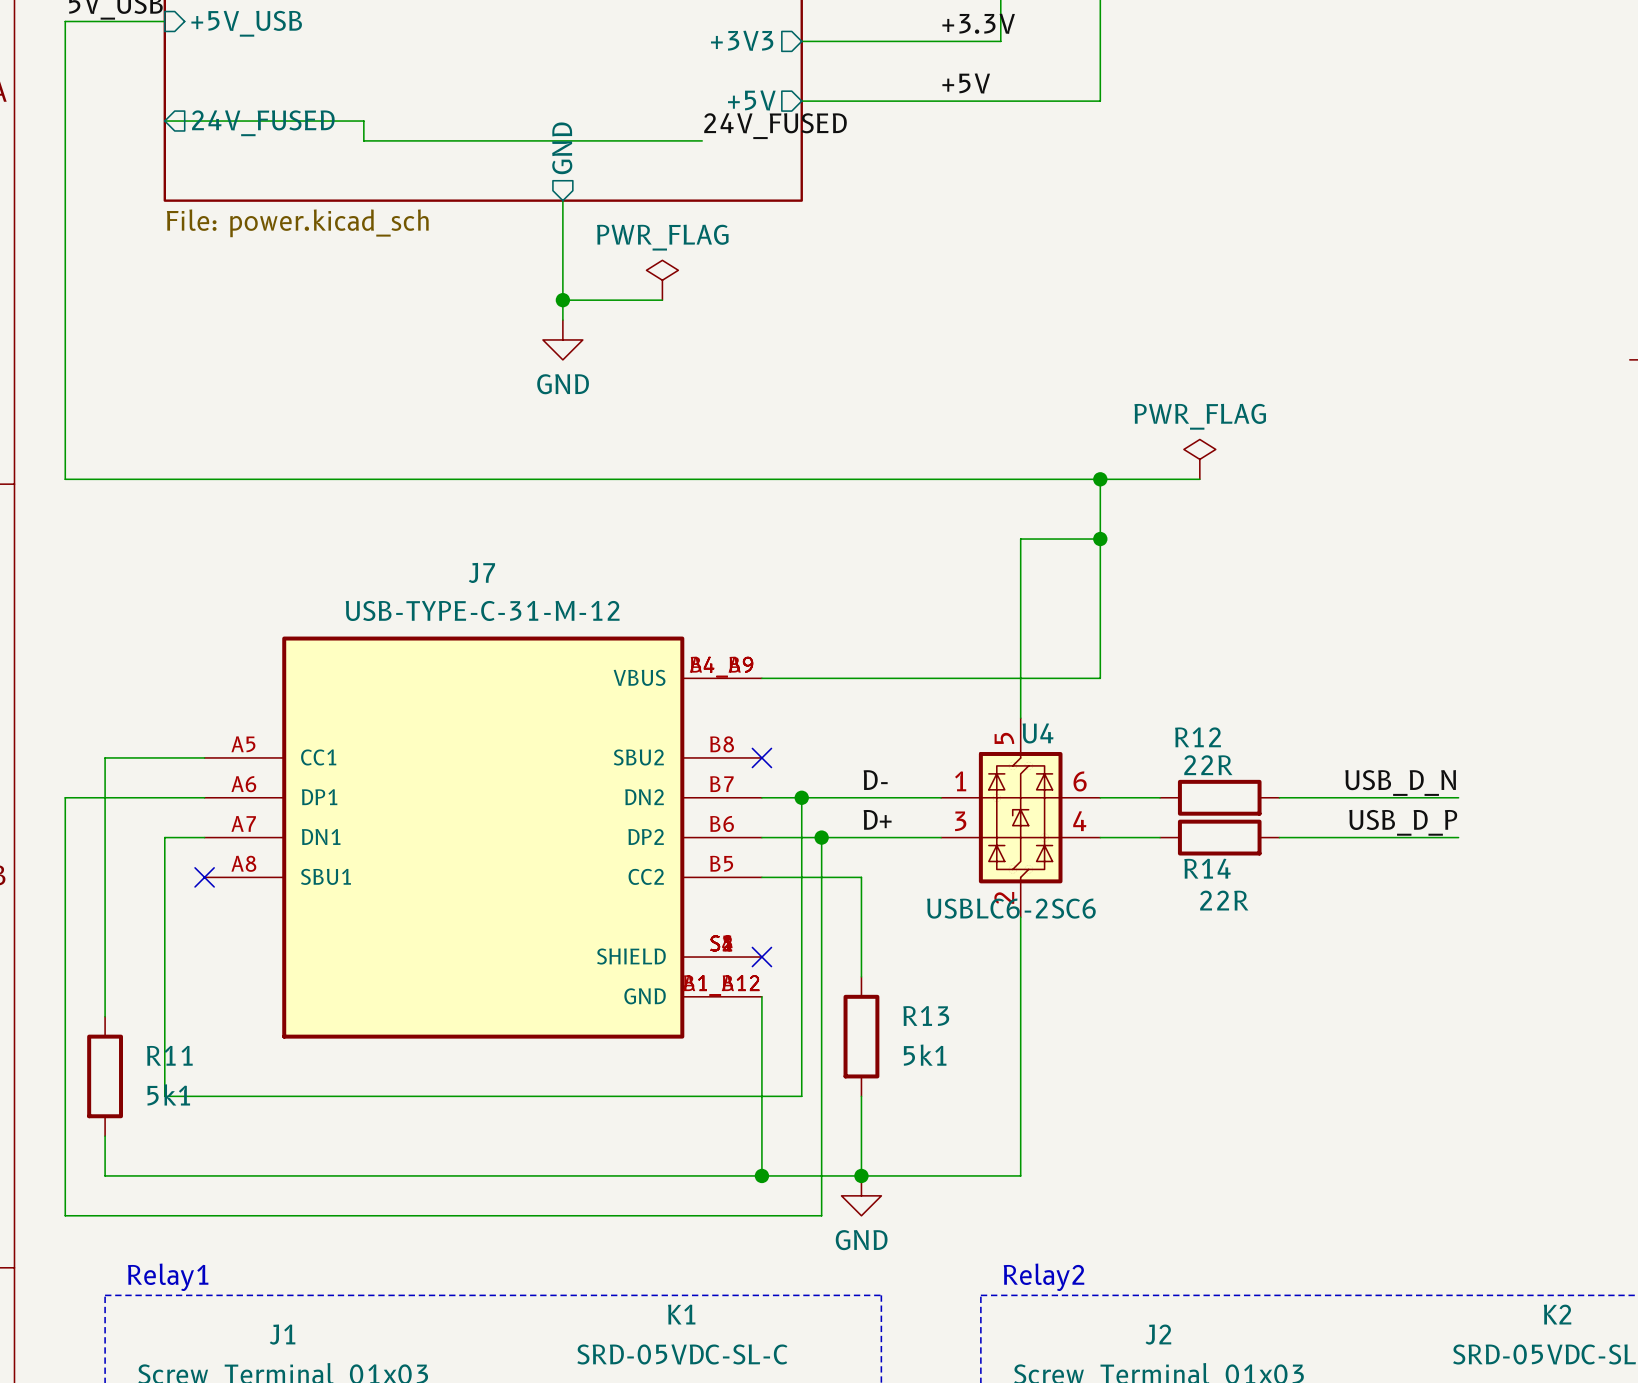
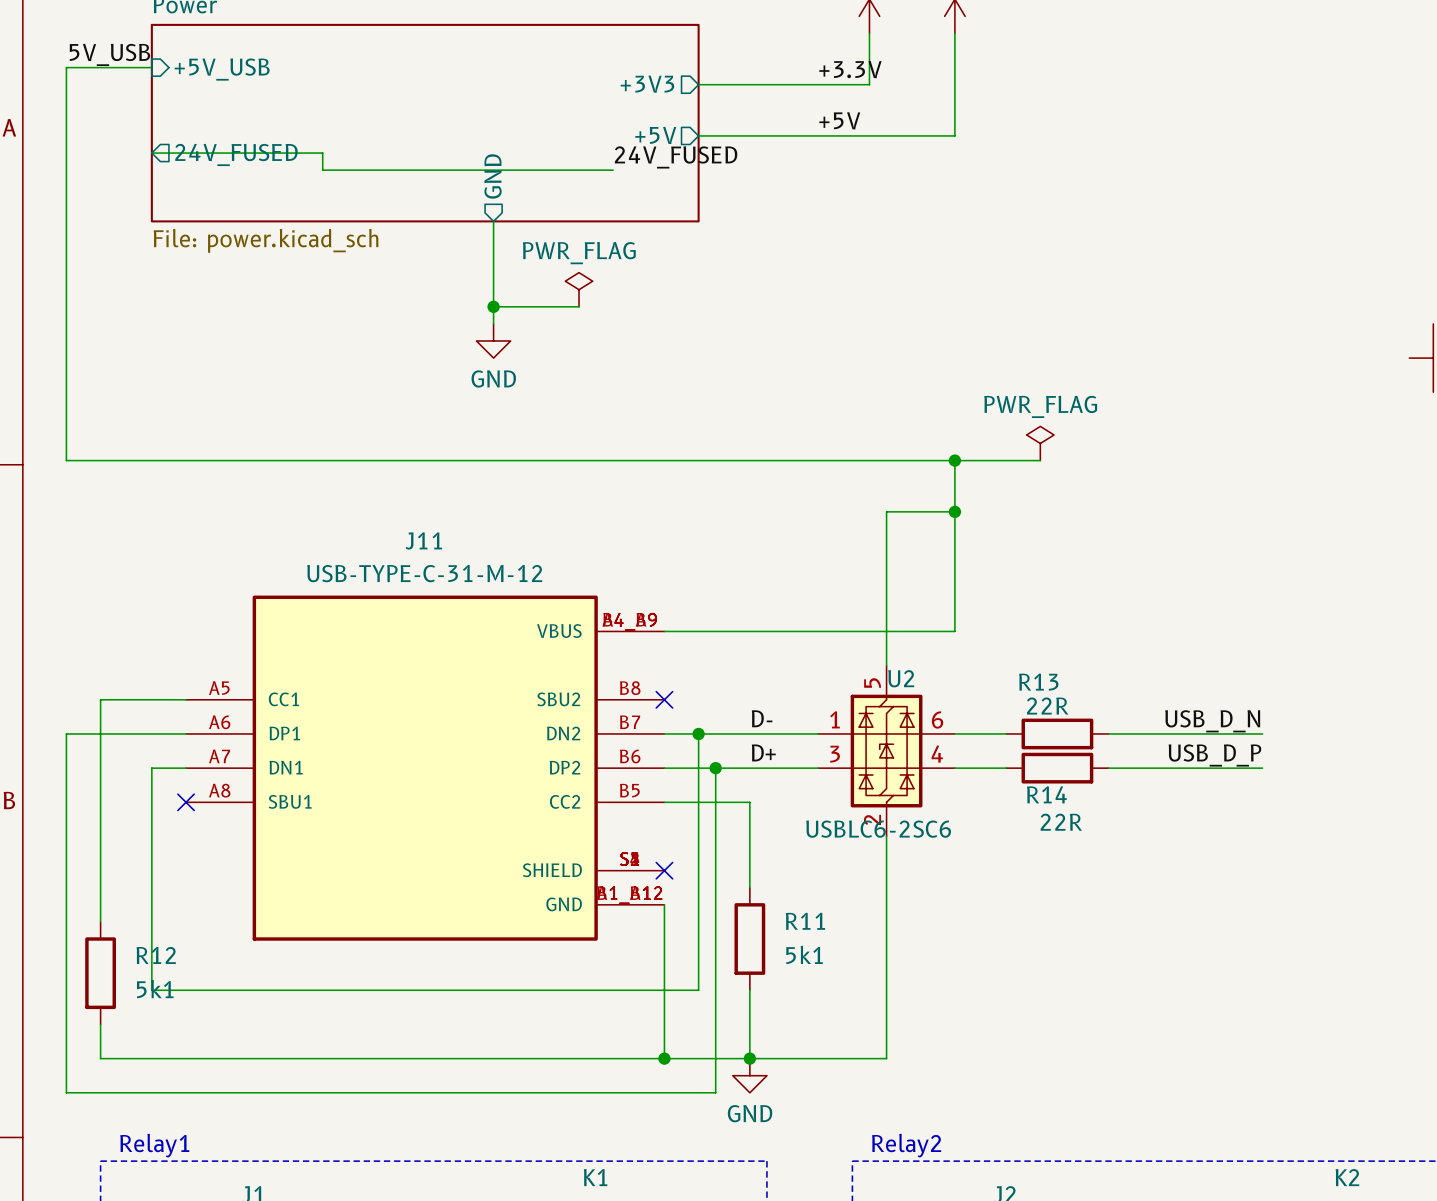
J7 name: J7 (481, 572) -> J11 (423, 540)
U4 name: U4 (1038, 733) -> U2 (901, 678)
R12 name: R12 (1197, 737) -> R13 (1038, 682)
R13 name: R13 (926, 1015) -> R11 (805, 921)
R11 name: R11 (169, 1055) -> R12 (156, 955)

